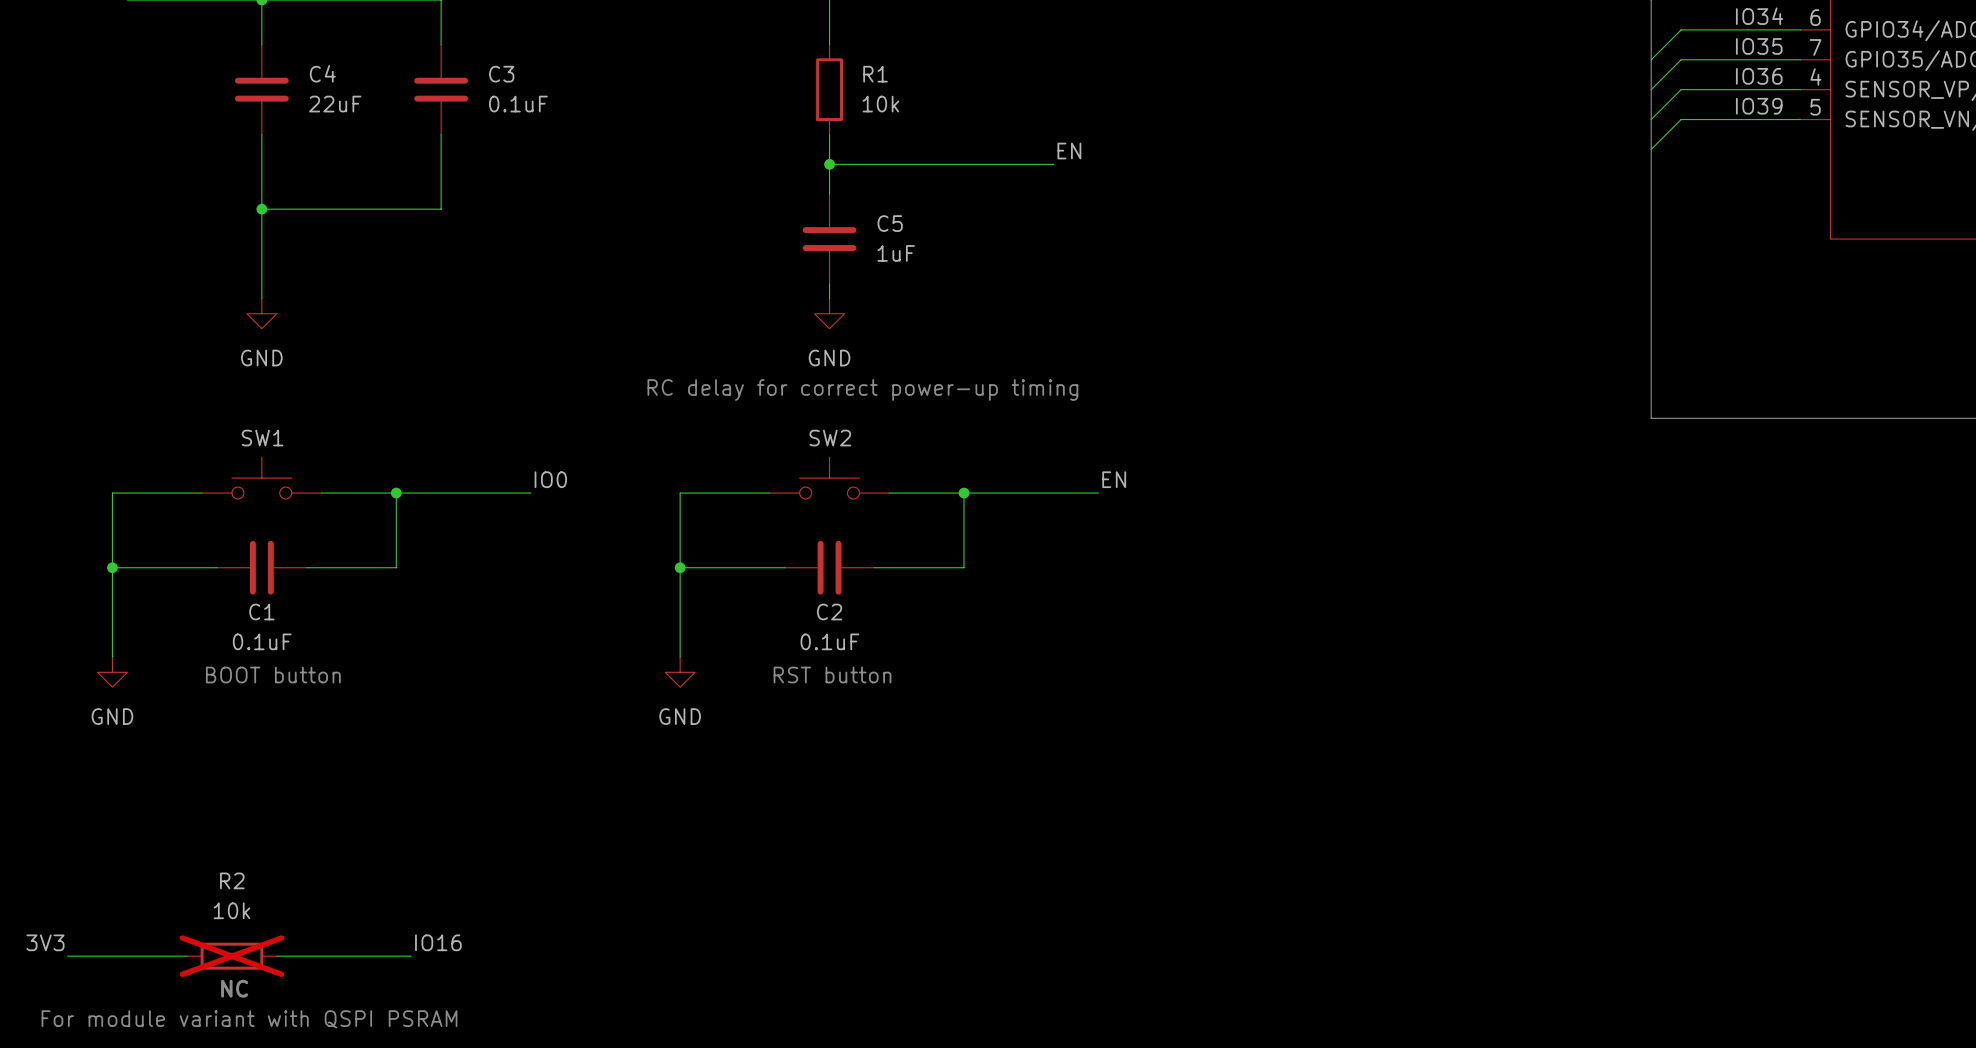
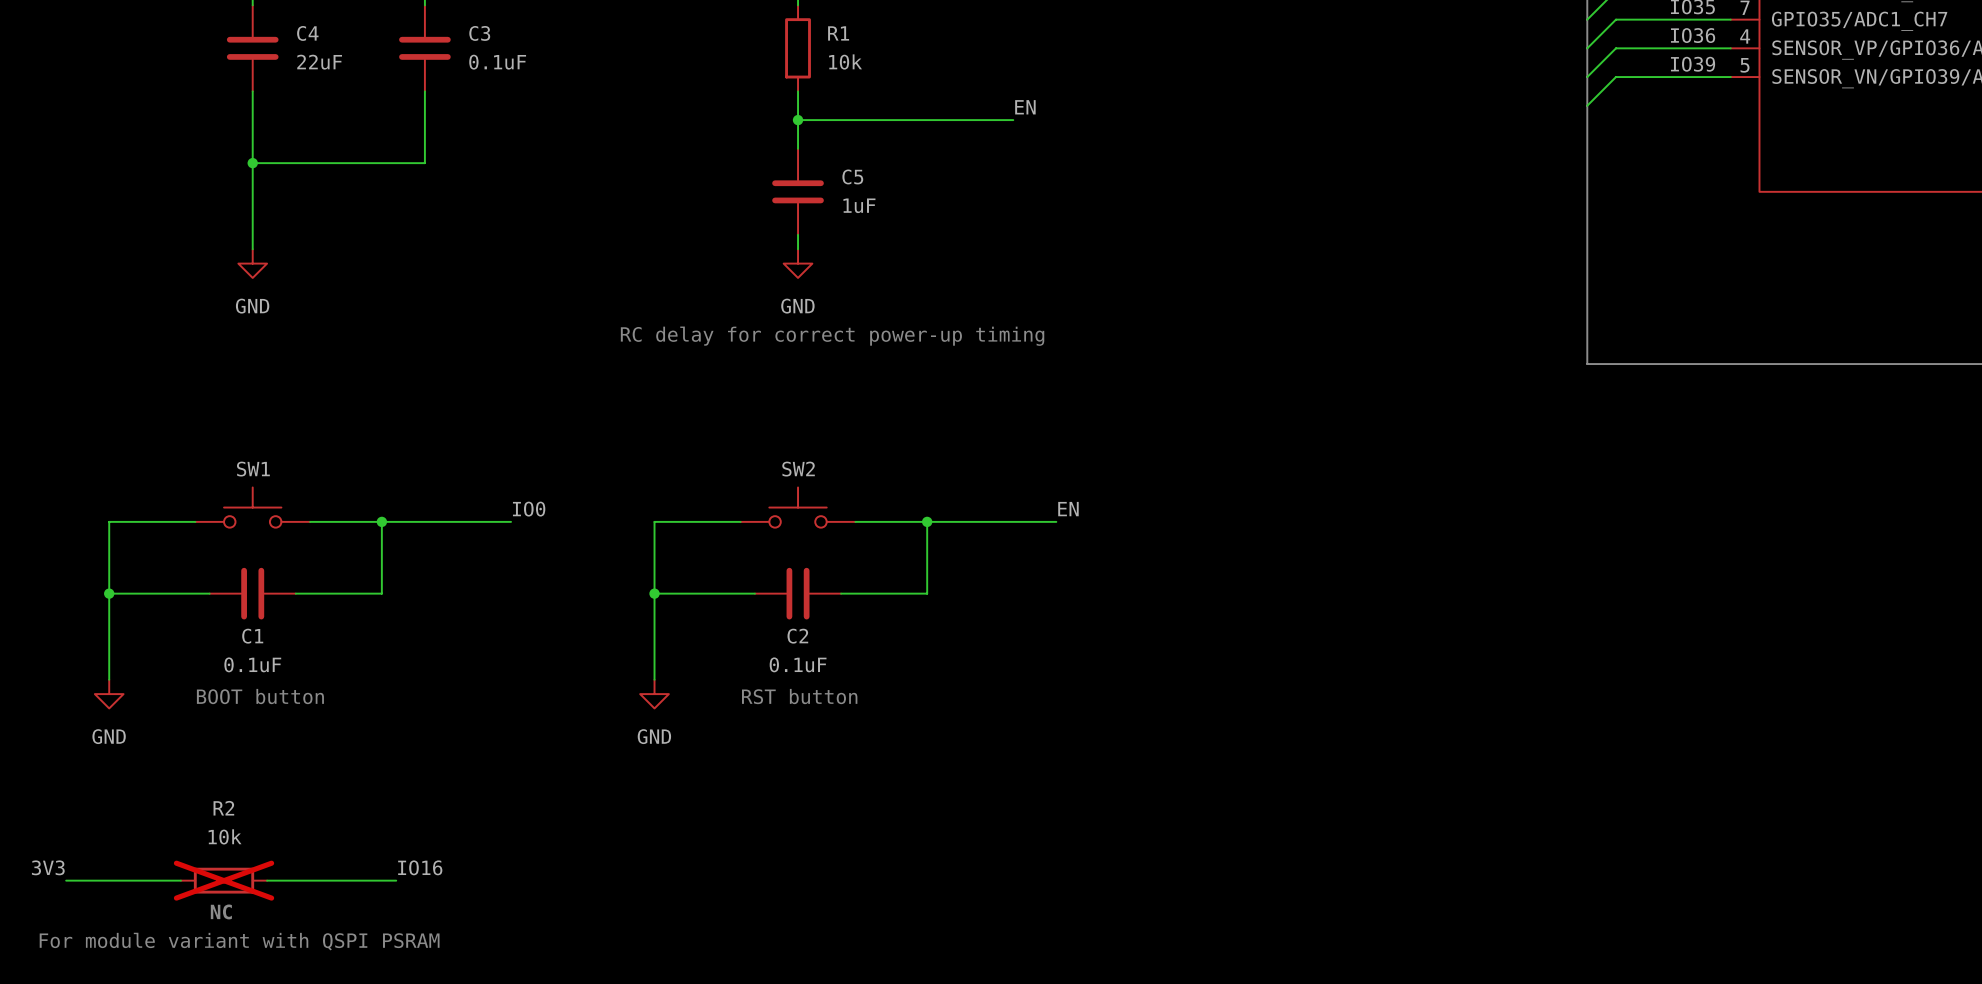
SW1 position: (261, 478) -> (252, 507)
SW2 position: (829, 478) -> (798, 507)
label position: IO0 (550, 479) -> IO0 (529, 509)
label position: EN (1114, 479) -> EN (1068, 509)
wire: (202, 493) (112, 493) (112, 582) -> (195, 521) (109, 521)
wire: (321, 493) (530, 493) -> (310, 521) (511, 521)
wire: (396, 493) (396, 567) (306, 567) -> (381, 521) (381, 593) (295, 593)
junction: (396, 493) -> none
wire: (769, 493) (680, 493) (680, 582) -> (740, 521) (654, 521)
wire: (889, 493) (1098, 493) -> (855, 521) (1056, 521)
wire: (964, 493) (964, 567) (874, 567) -> (927, 521) (927, 593) (841, 593)
junction: (964, 493) -> none
wire: (112, 567) (217, 567) -> none
junction: (112, 567) -> none
C1 position: (261, 567) -> (252, 593)
wire: (680, 567) (784, 567) -> none
junction: (680, 567) -> none
C2 position: (829, 567) -> (798, 593)
junction: none -> (381, 521)
junction: none -> (927, 521)
junction: none -> (109, 593)
wire: none -> (209, 593) (109, 593) (109, 679)
junction: none -> (654, 593)
wire: none -> (754, 593) (654, 593) (654, 679)
power symbol position: GND (112, 672) -> GND (109, 694)
power symbol position: GND (680, 672) -> GND (654, 694)
text position: BOOT button (273, 675) -> BOOT button (260, 696)
text position: RST button (832, 675) -> RST button (799, 696)

